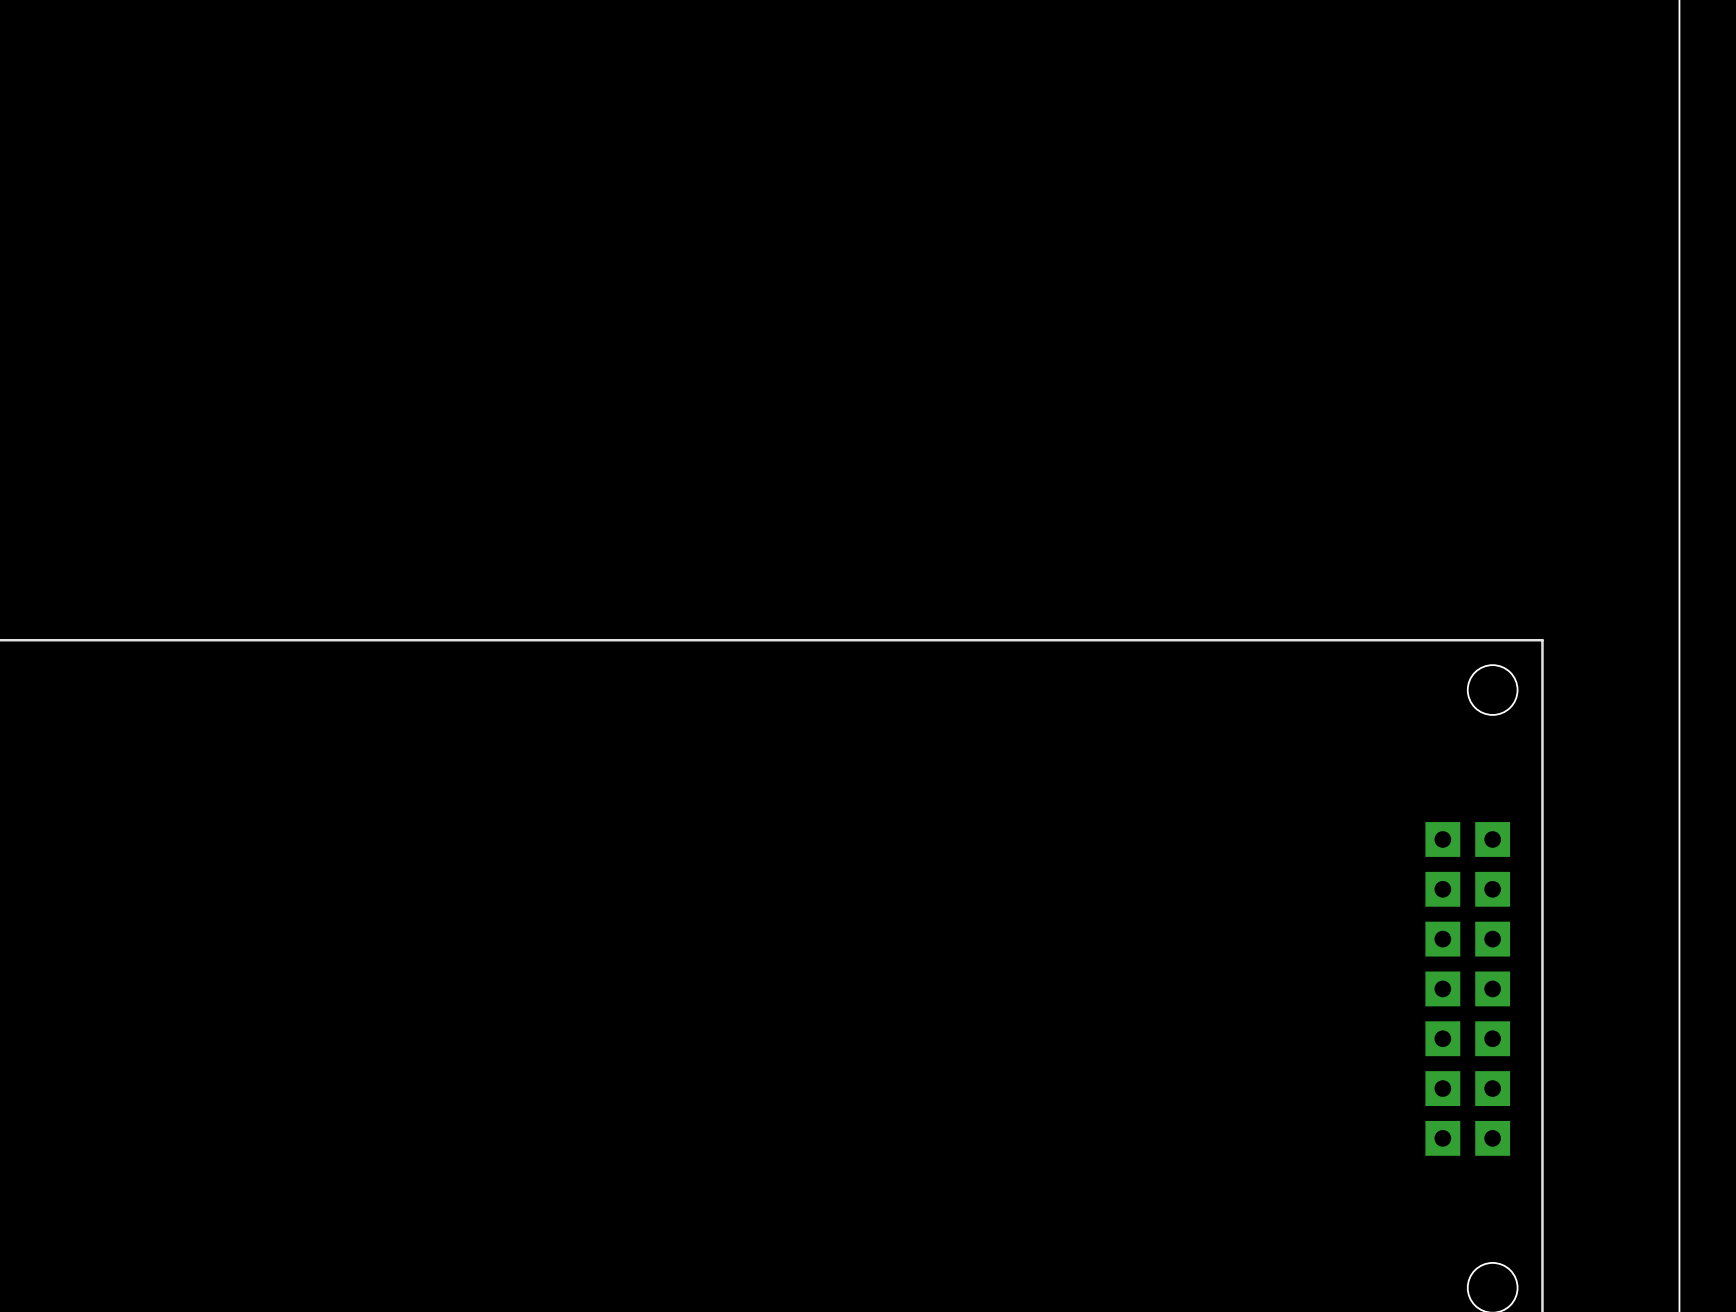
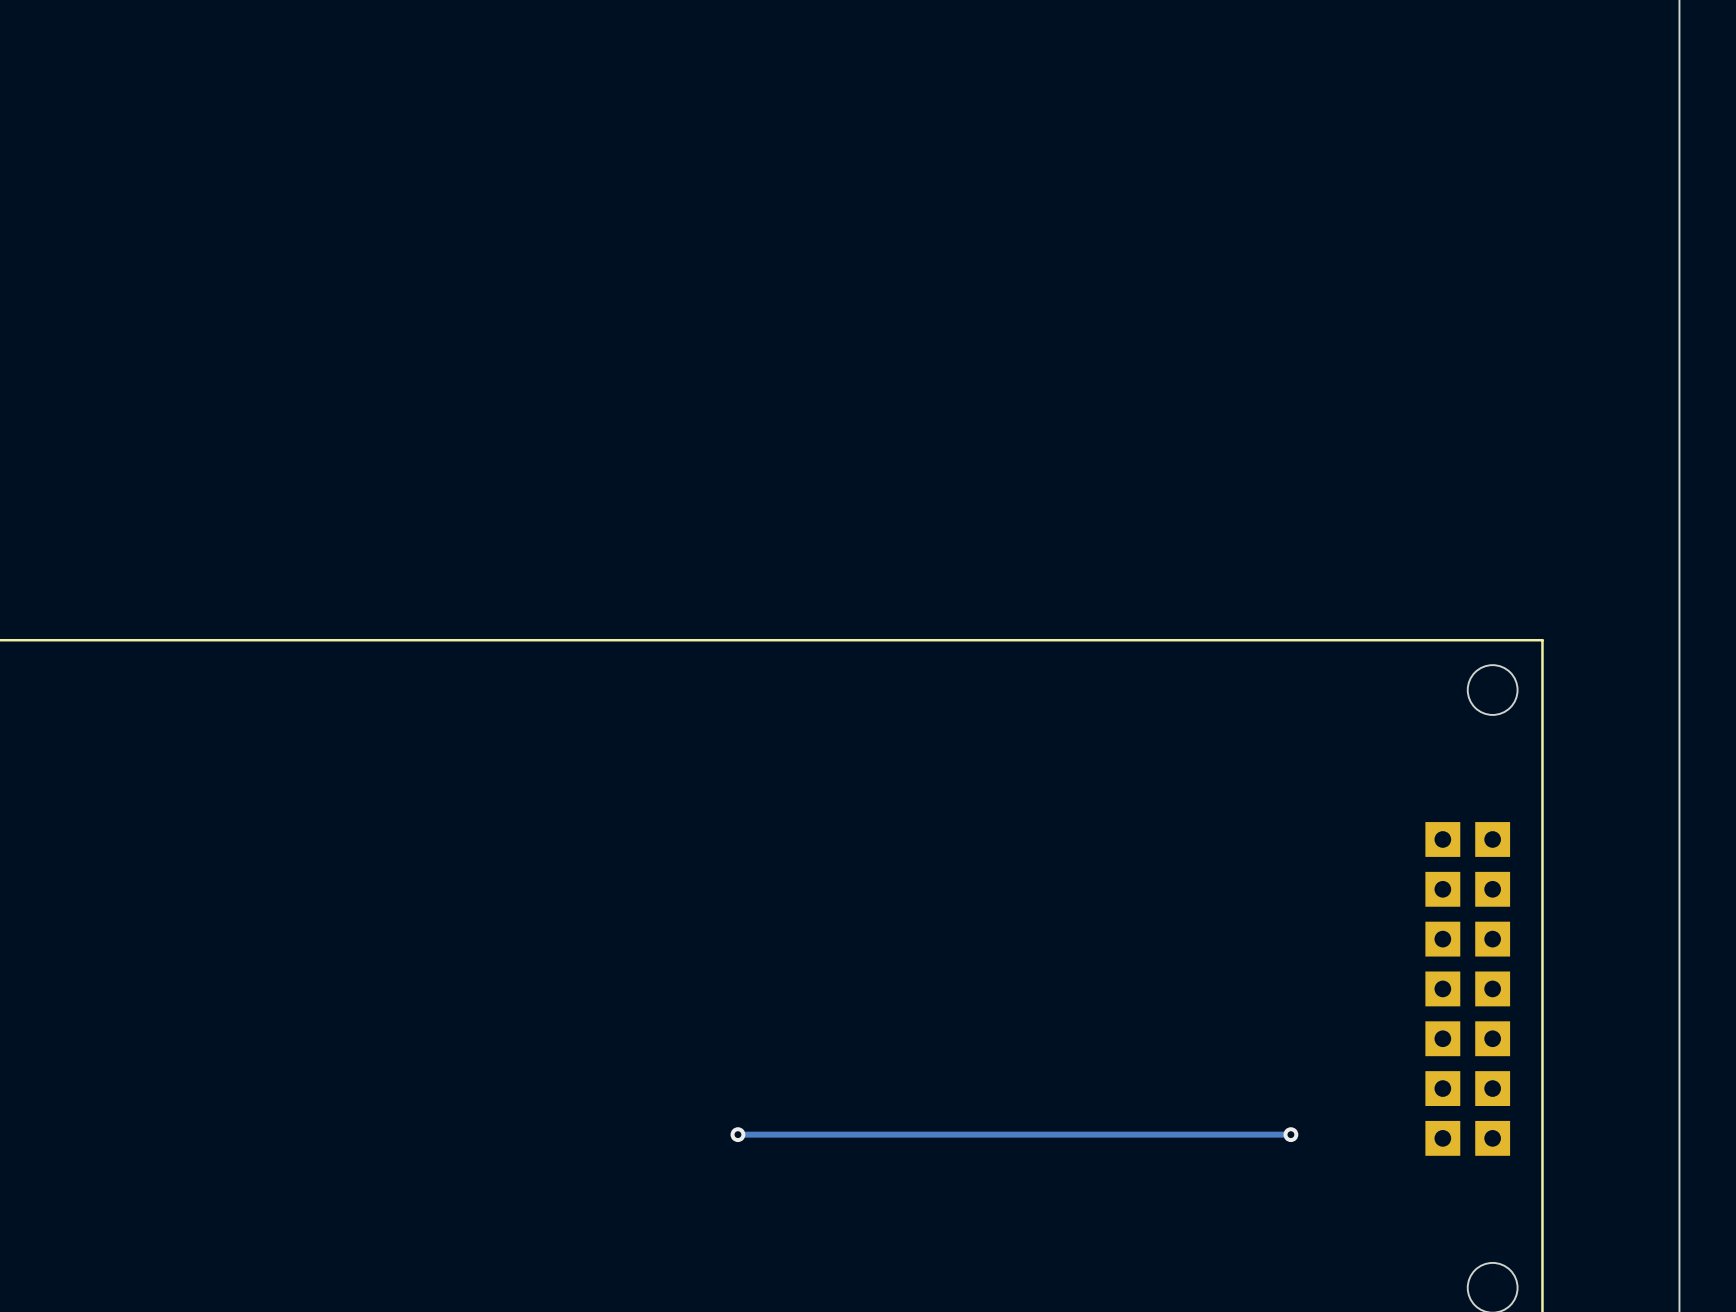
via: none -> (737, 1134)
track: none -> (1290, 1134) (737, 1134)
via: none -> (1290, 1134)

